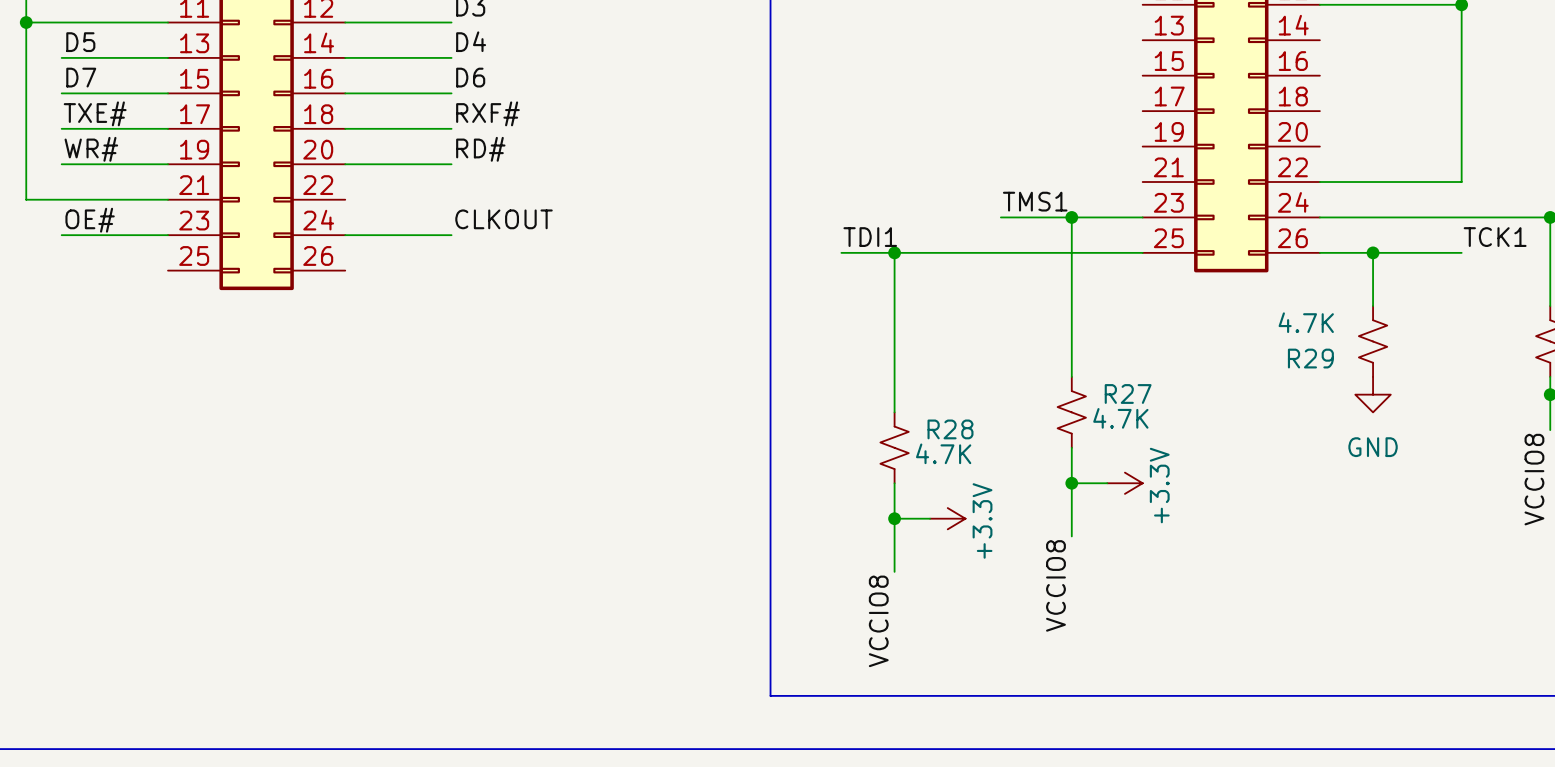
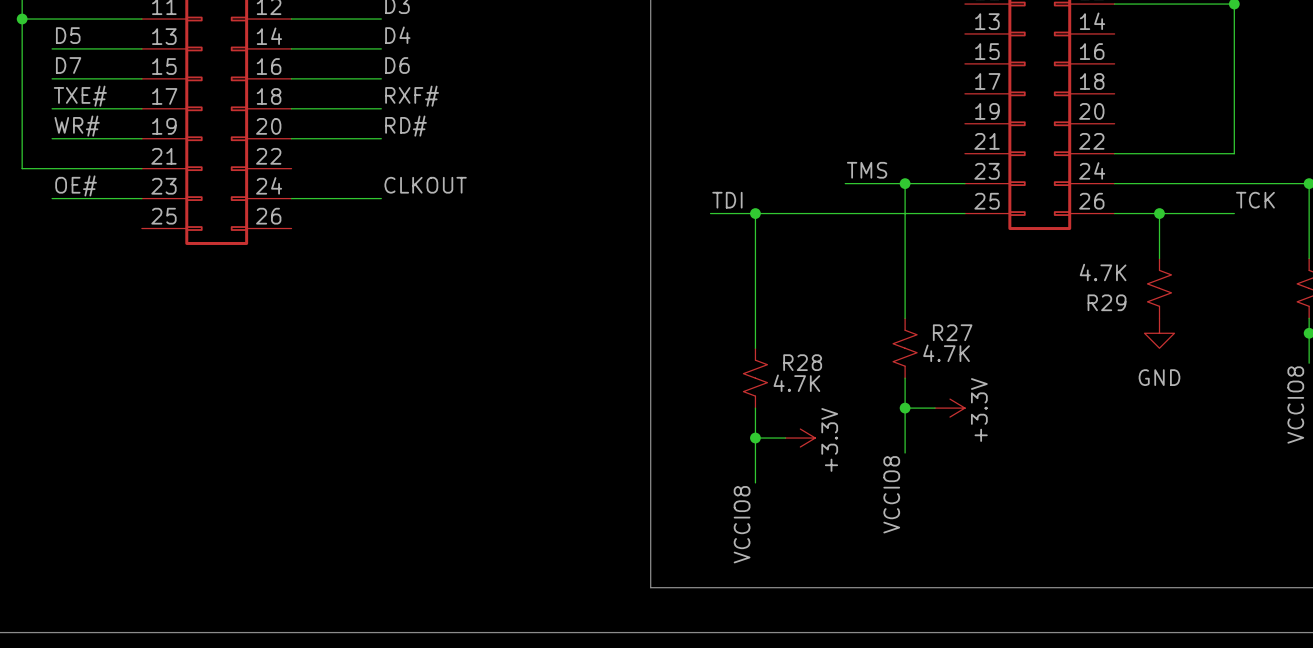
label: TMS1 (1035, 201) -> TMS (867, 170)
label: TDI1 (870, 237) -> TDI (727, 200)
label: TCK1 (1495, 237) -> TCK (1255, 200)

